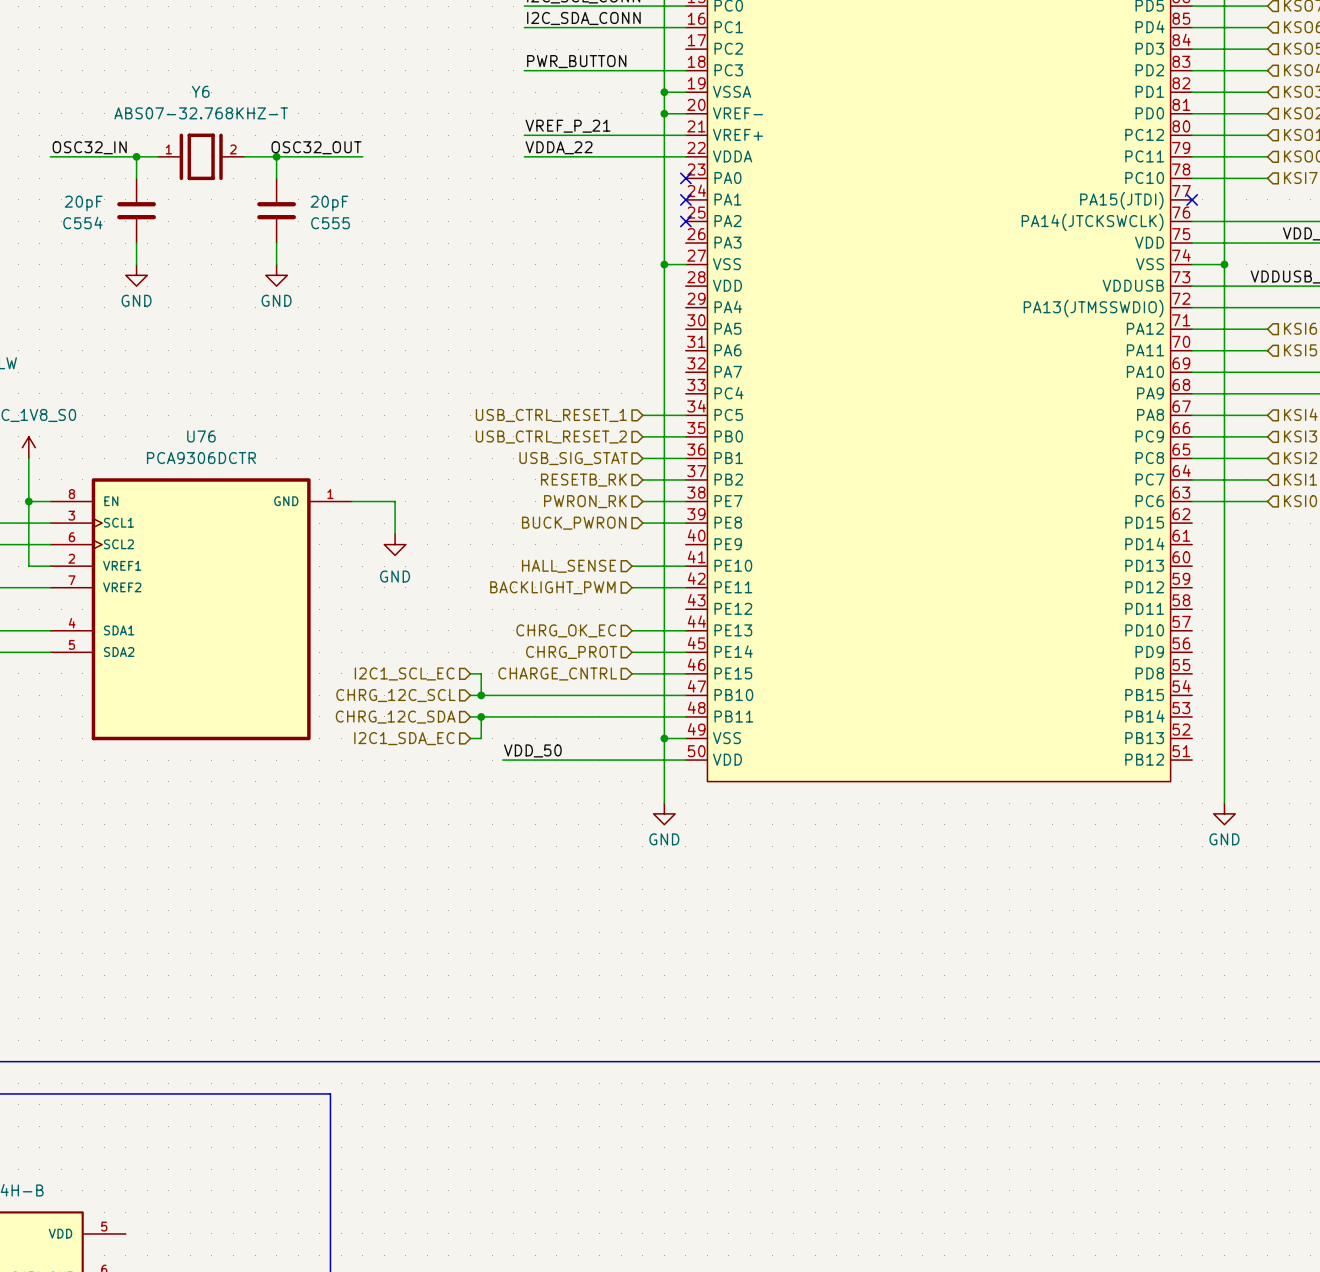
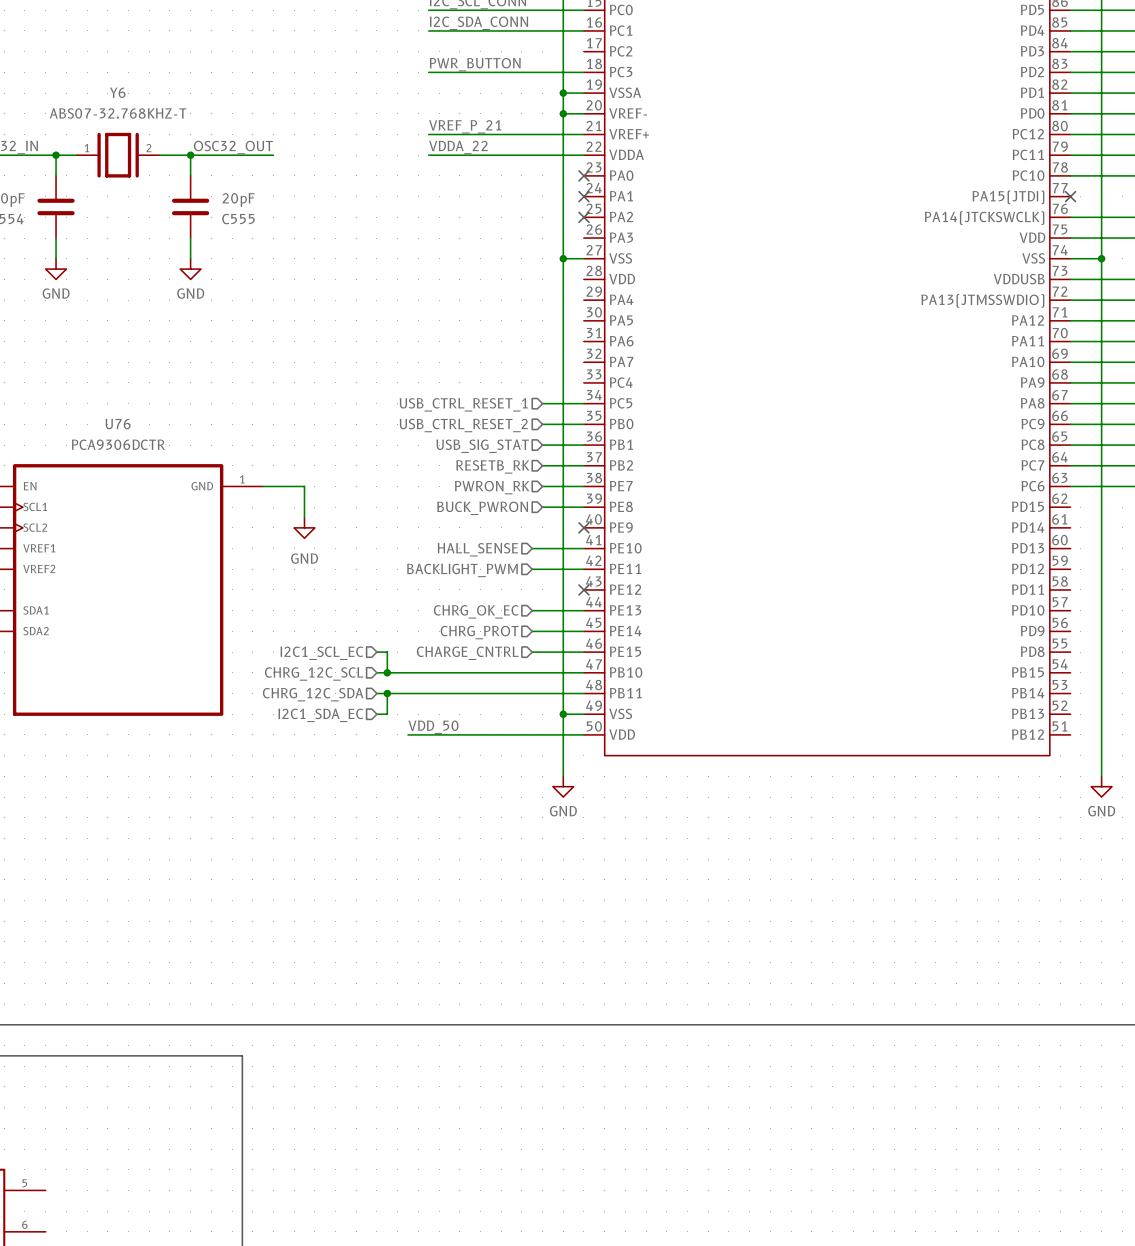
no-connect mark: none -> (583, 527)
no-connect mark: none -> (583, 589)

